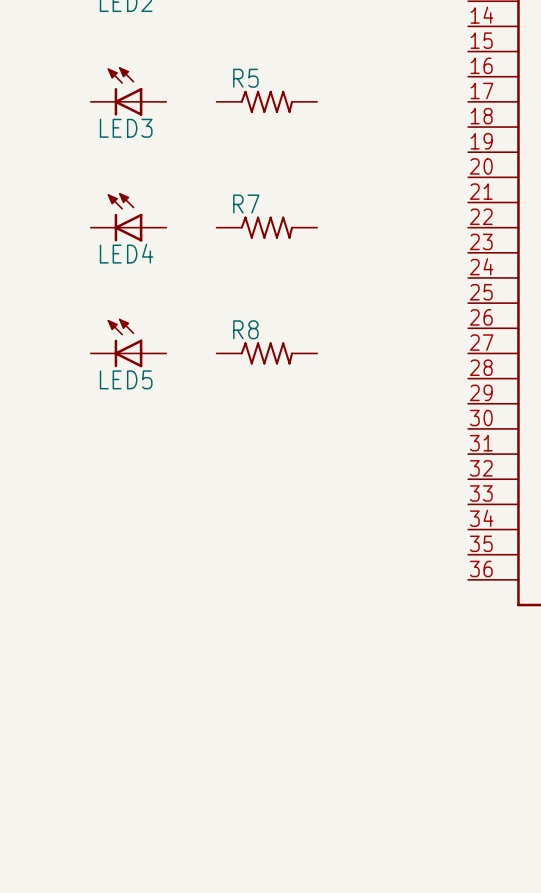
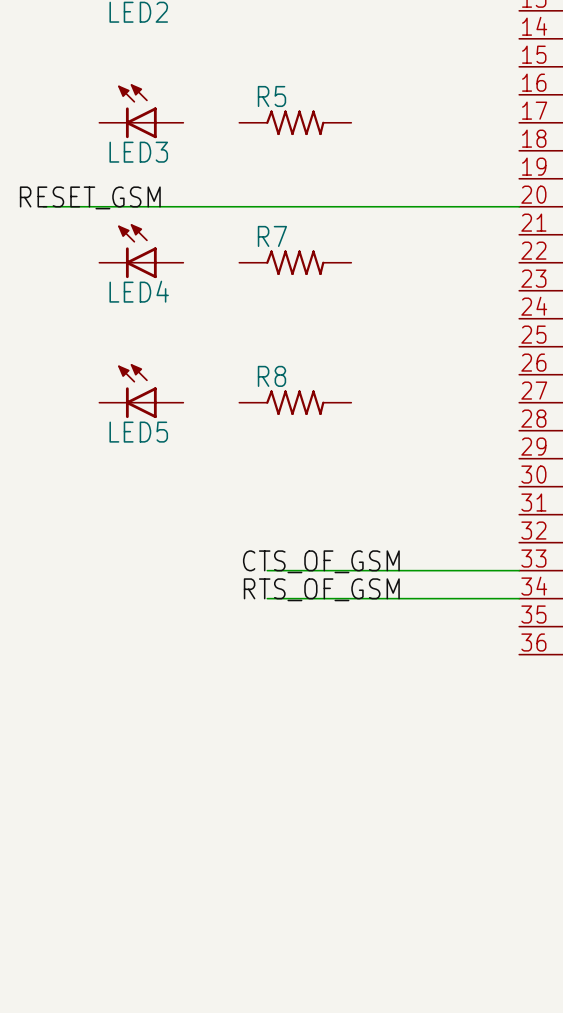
label: none -> RESET_GSM (90, 197)
wire: none -> (43, 206) (519, 206)
label: none -> CTS_OF_GSM (321, 561)
wire: none -> (267, 570) (519, 570)
label: none -> RTS_OF_GSM (321, 589)
wire: none -> (267, 598) (519, 598)

